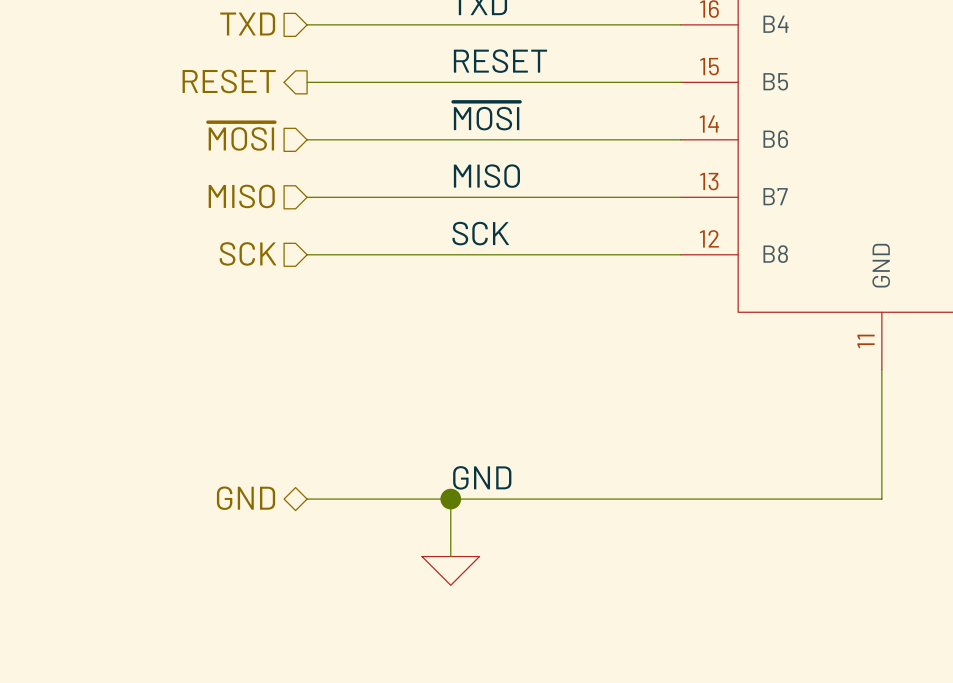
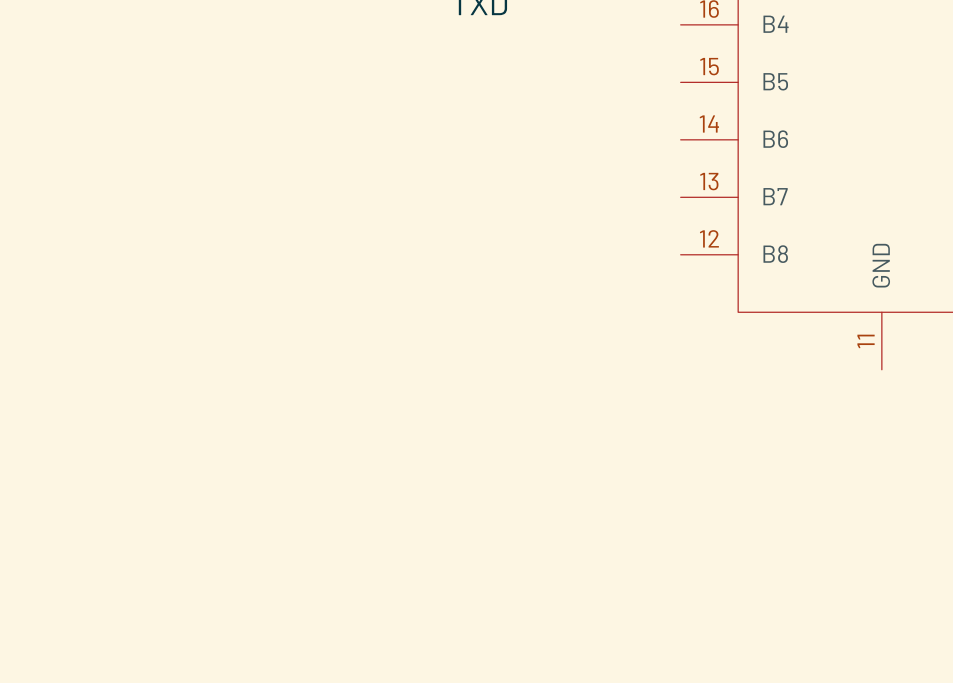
hierarchical label: TXD (247, 24) -> none
wire: (307, 24) (680, 24) -> none
label: RESET (500, 61) -> none
hierarchical label: RESET (229, 81) -> none
wire: (307, 82) (680, 82) -> none
label: ~{MOSI} (486, 116) -> none
hierarchical label: ~{MOSI} (241, 136) -> none
wire: (307, 139) (680, 139) -> none
label: MISO (486, 176) -> none
hierarchical label: MISO (241, 196) -> none
wire: (307, 197) (680, 197) -> none
label: SCK (480, 233) -> none
hierarchical label: SCK (248, 253) -> none
wire: (307, 254) (680, 254) -> none
wire: (881, 369) (881, 499) (307, 499) -> none
label: GND (482, 477) -> none
hierarchical label: GND (246, 498) -> none
wire: (450, 499) (450, 556) -> none
junction: (450, 499) -> none
power symbol: (450, 570) -> none

